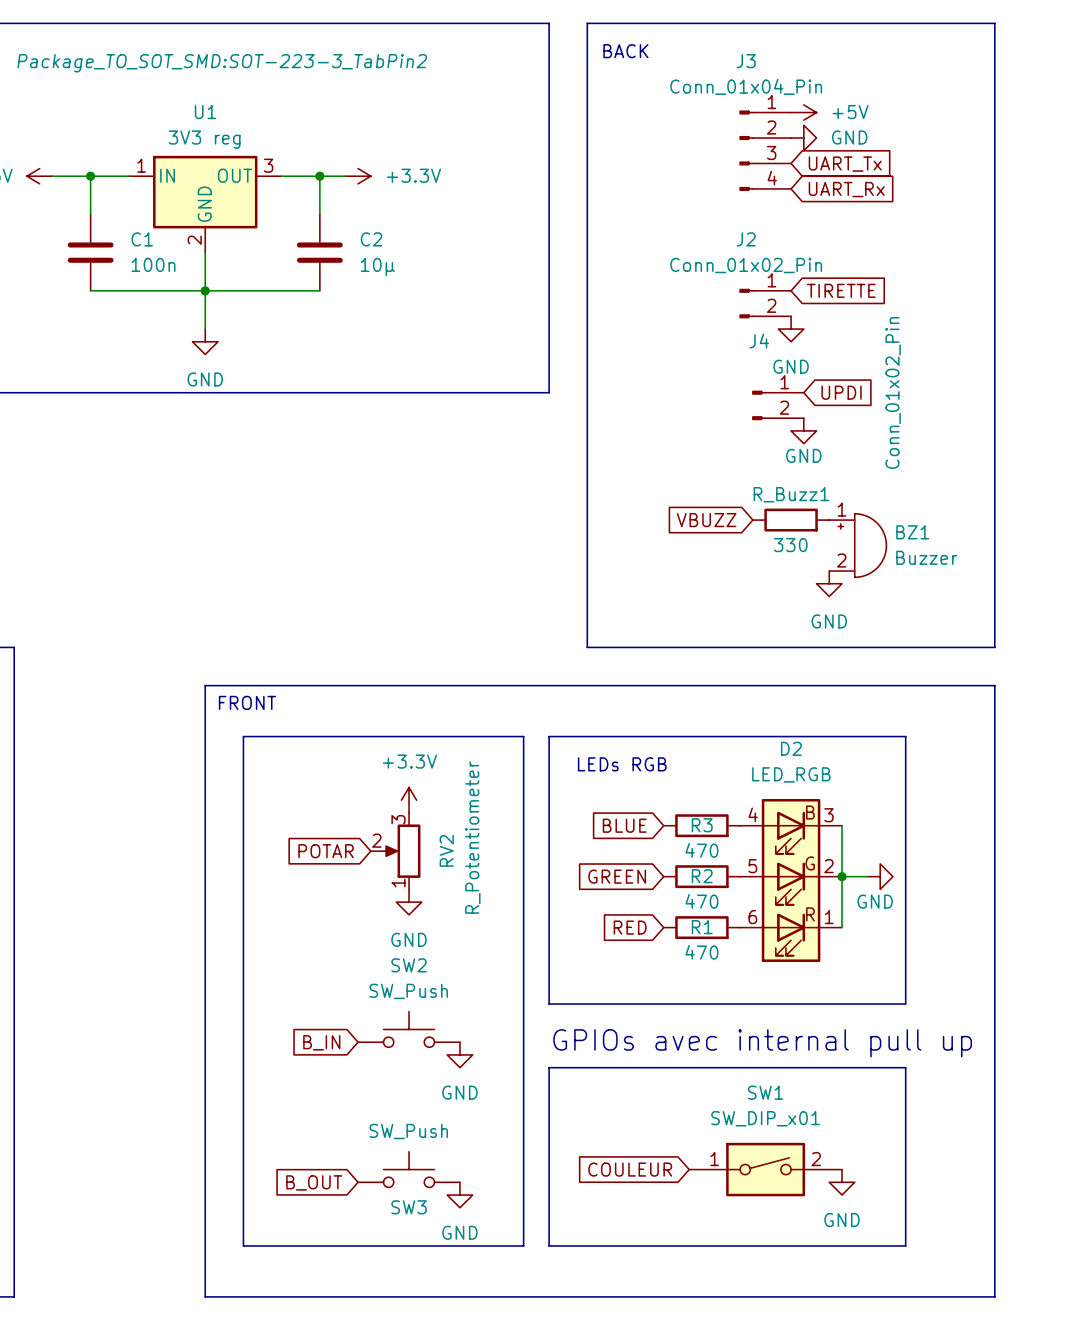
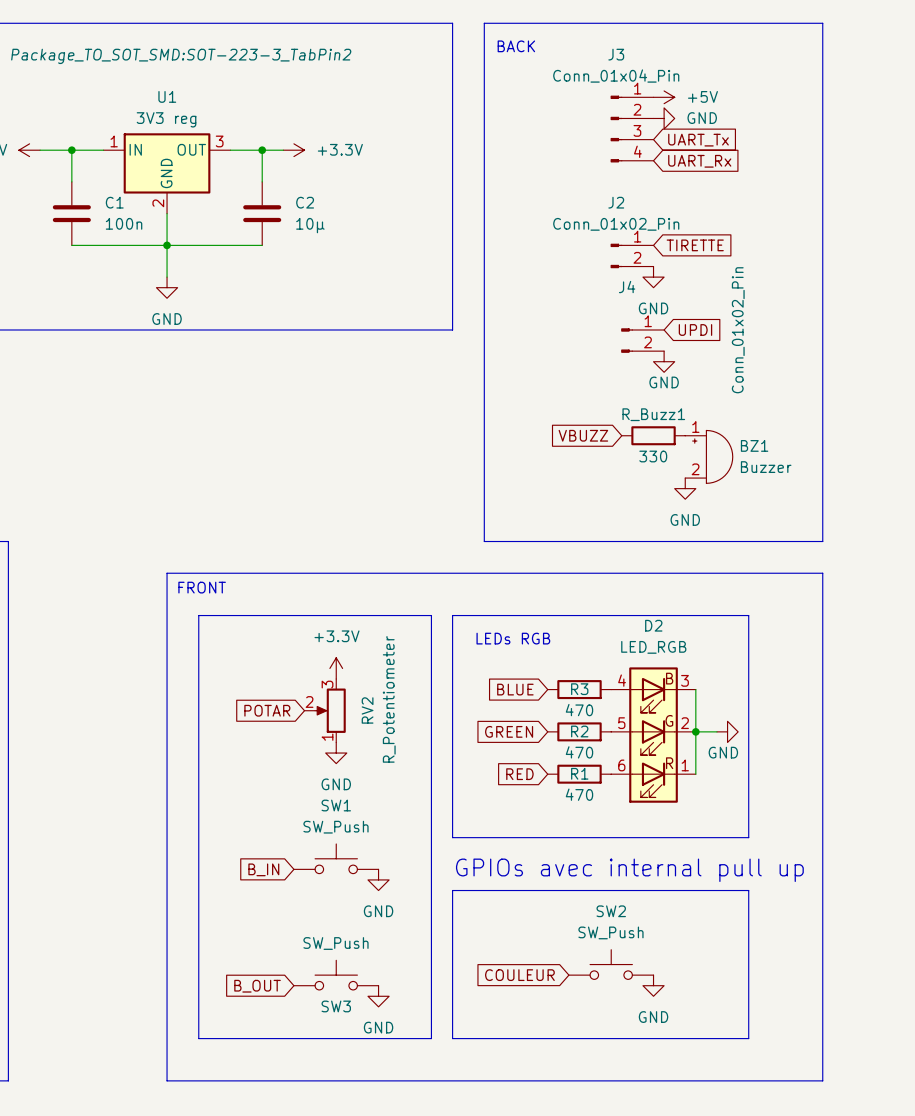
SW2 name: SW2 (409, 965) -> SW1 (336, 805)
SW2: none -> SW_Push (611, 964)
SW1: SW_DIP_x01 (765, 1169) -> none
power symbol position: GND (842, 1182) -> GND (653, 985)

